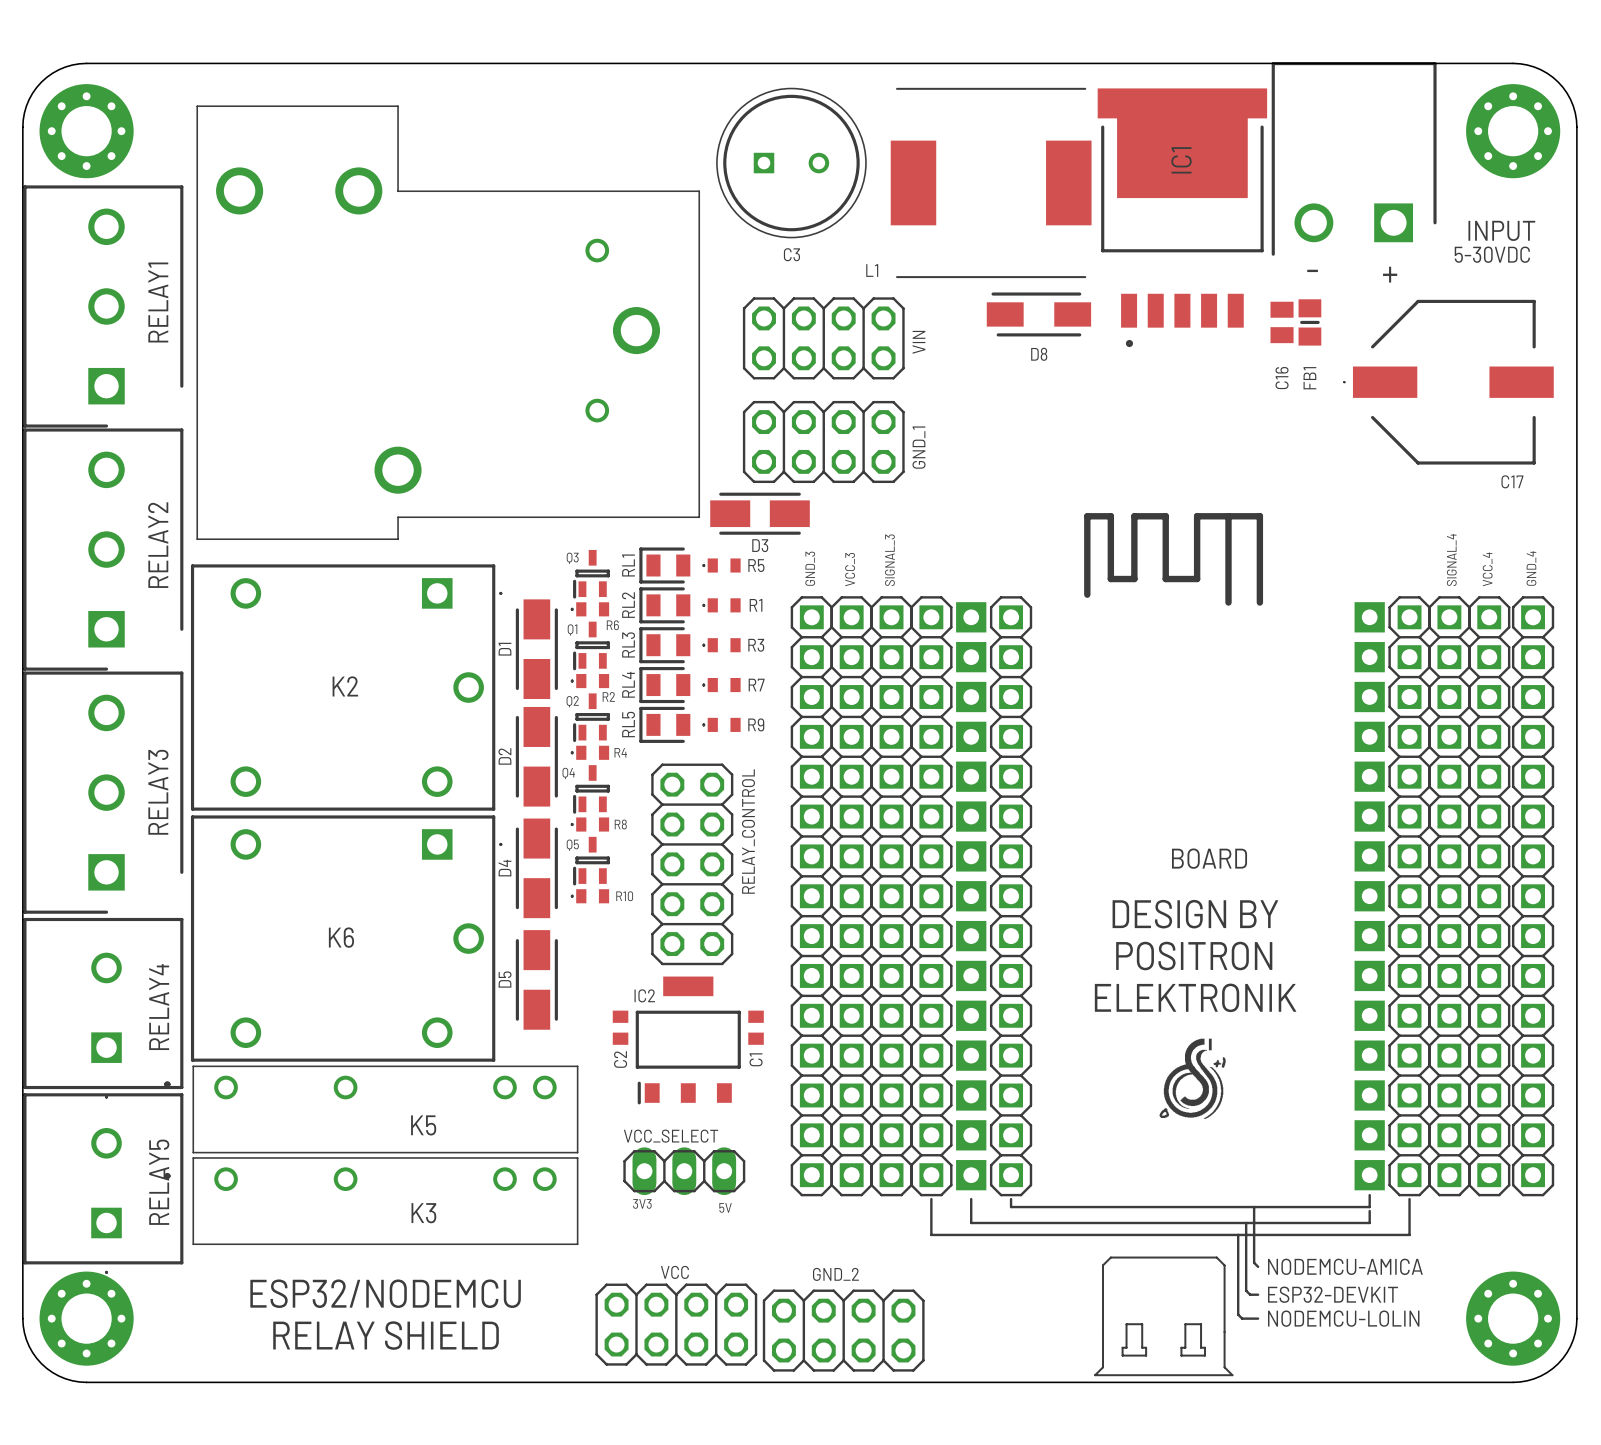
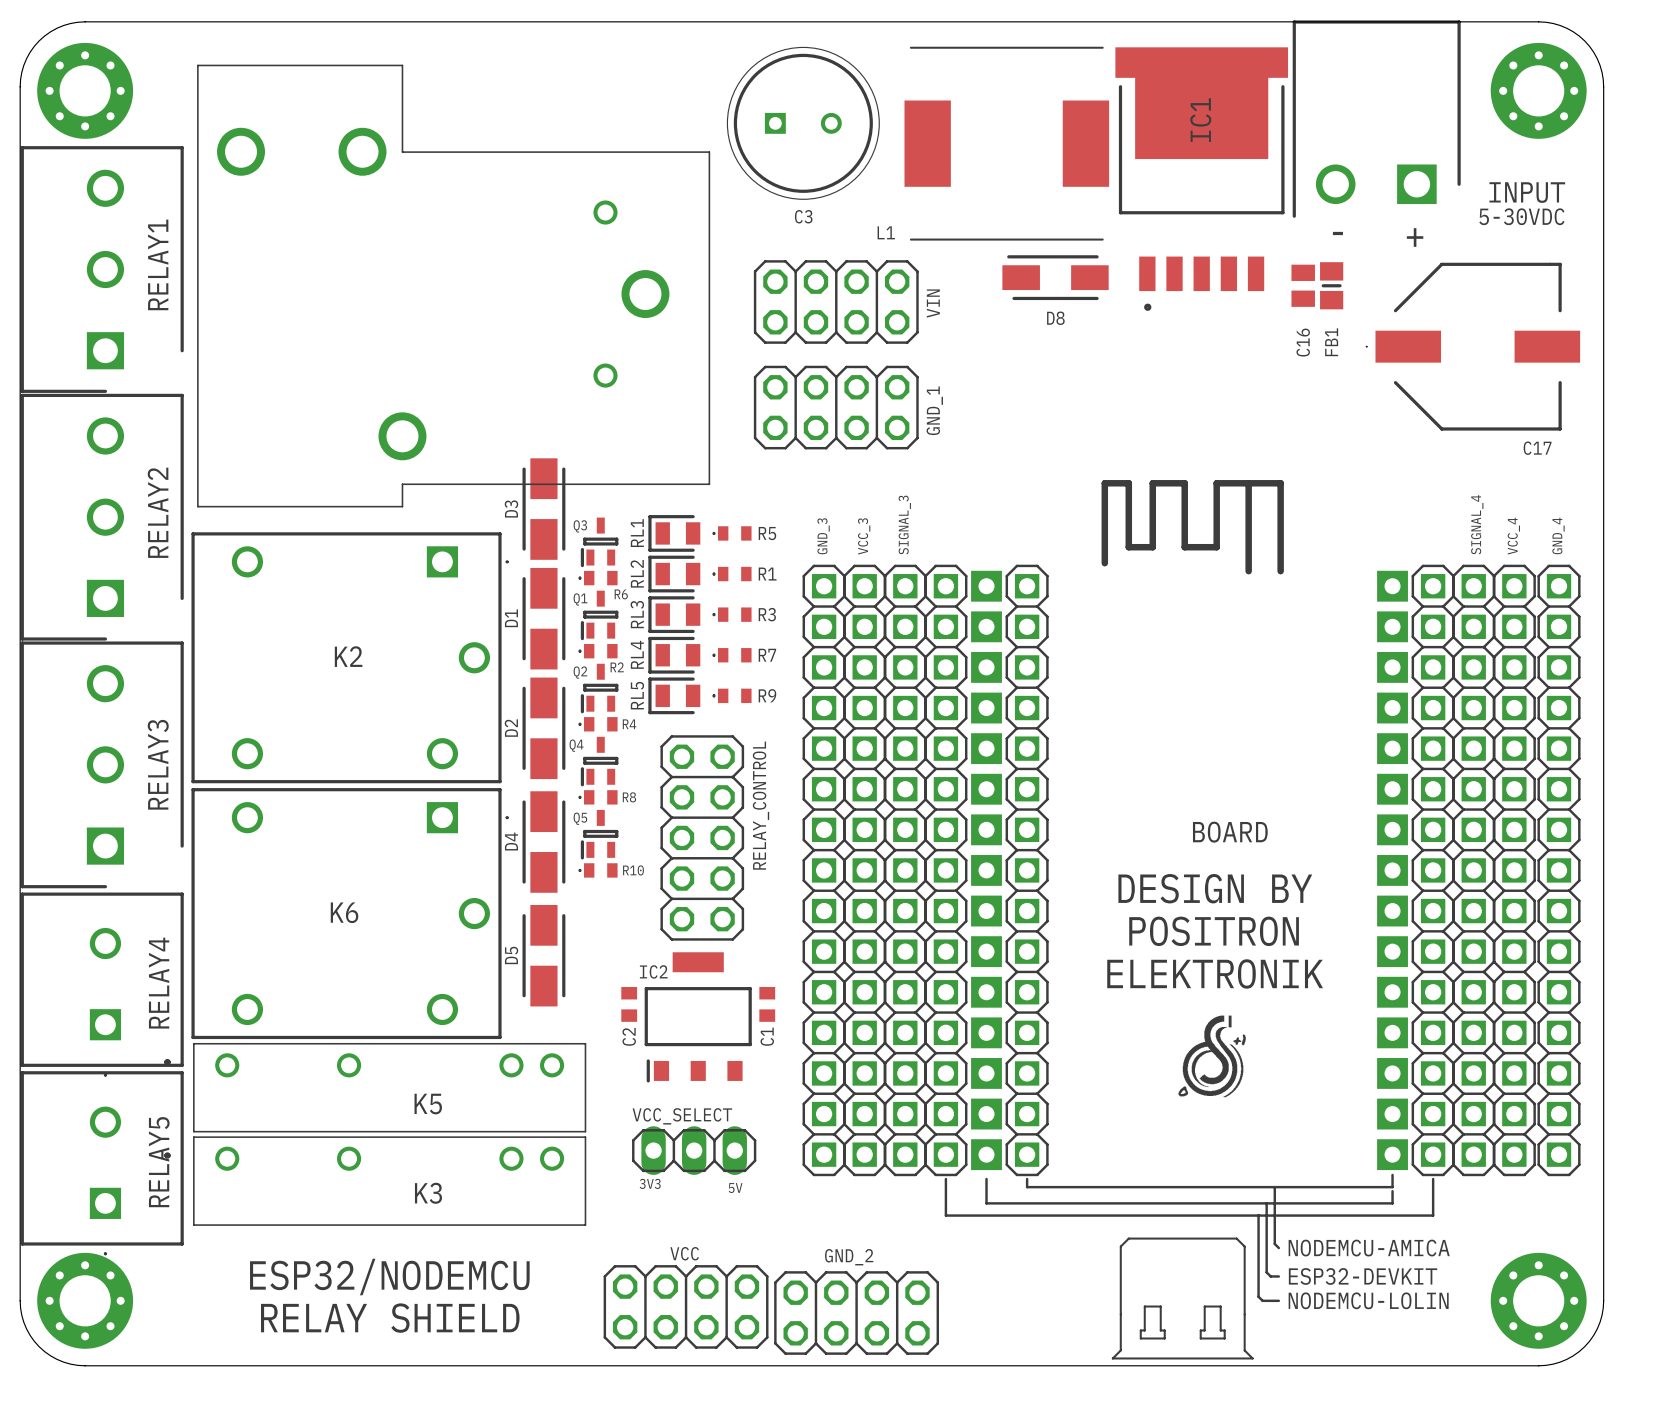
D3 rotation: 0° (760, 513) -> 90° clockwise (543, 509)
D3 position: (760, 513) -> (543, 509)

